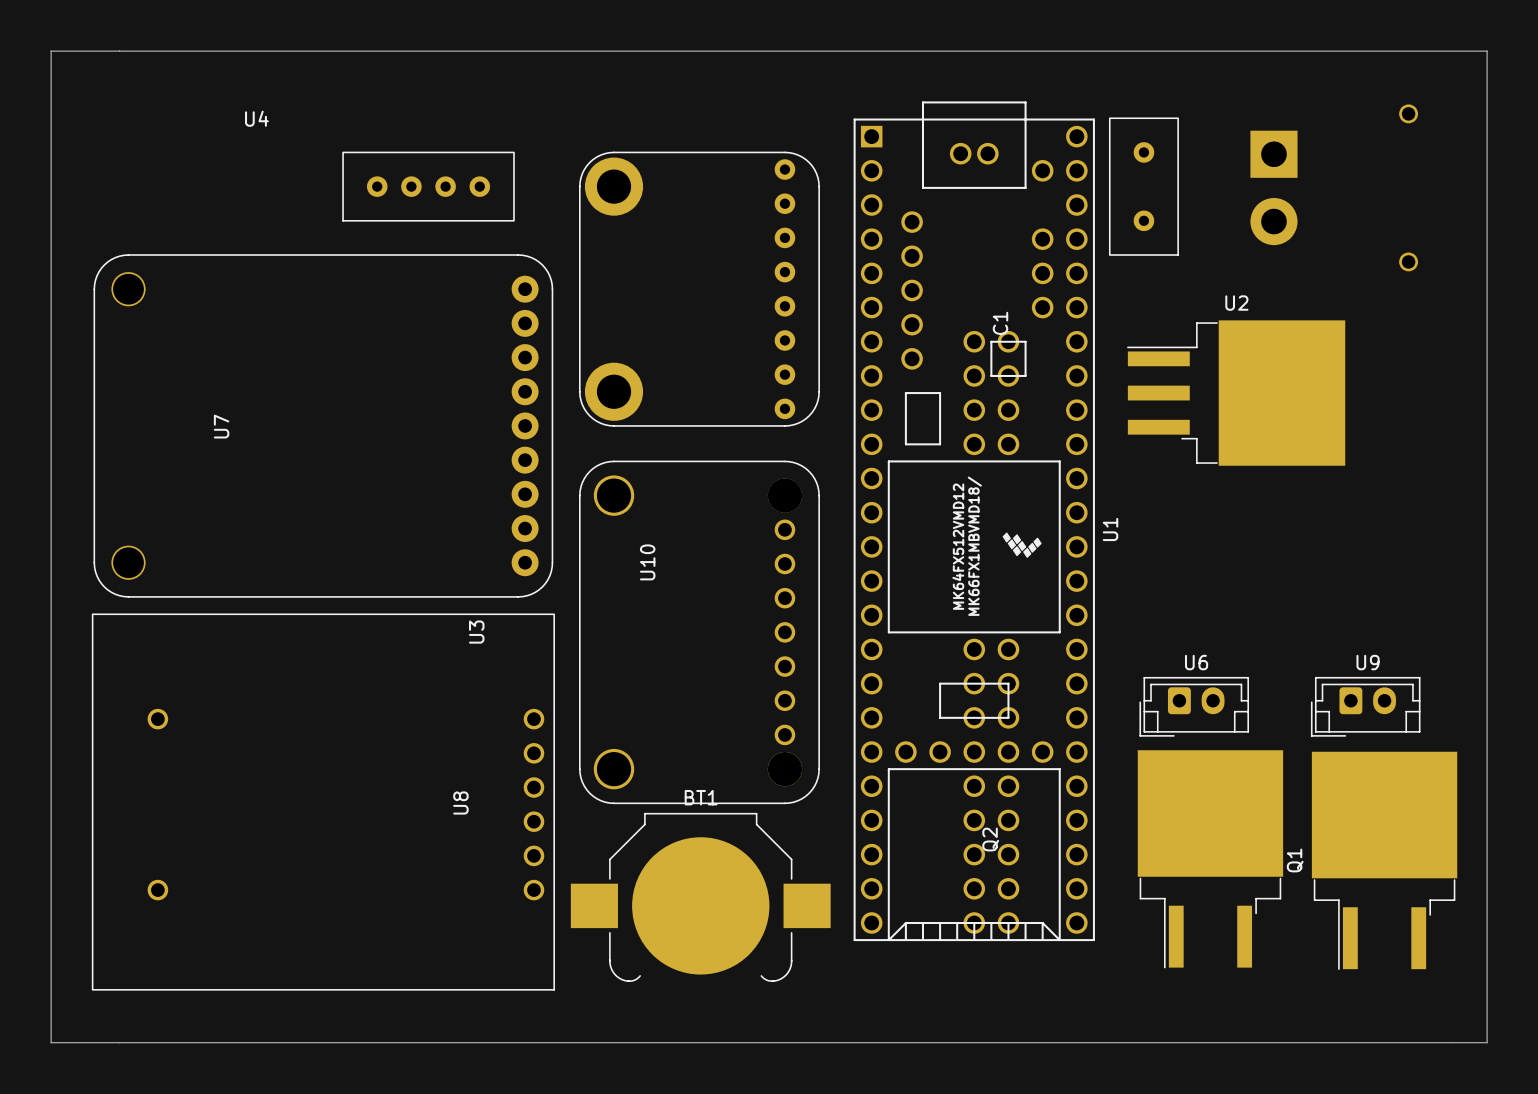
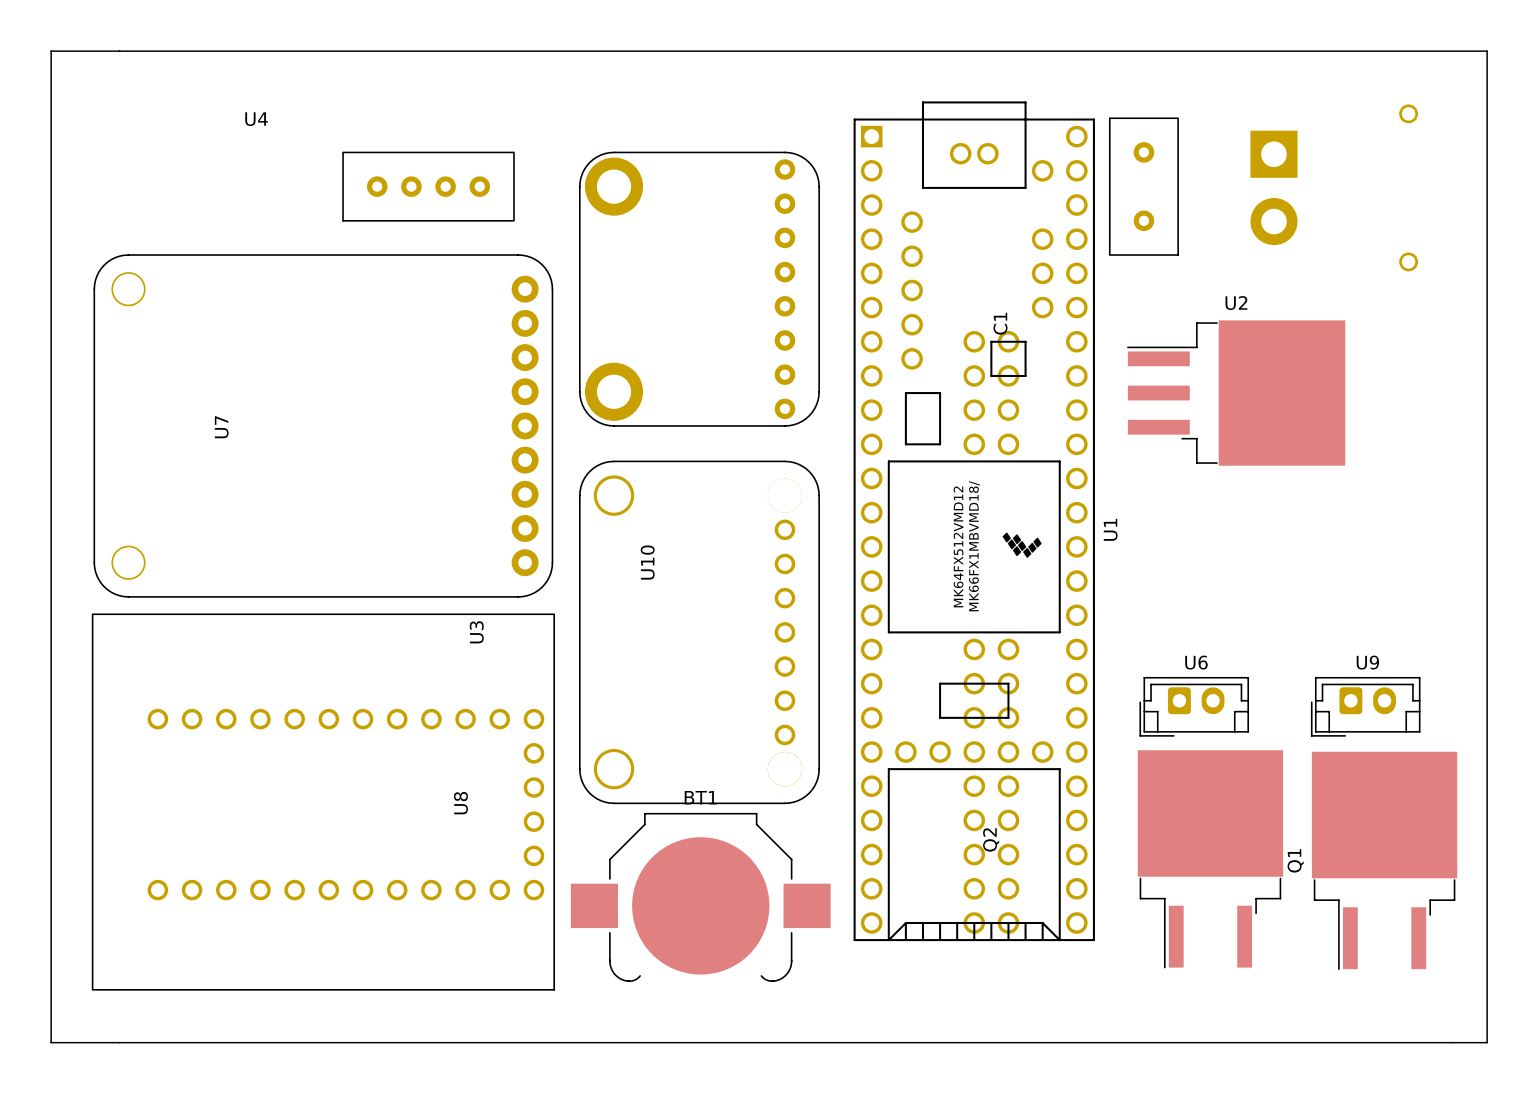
U8 footprint: [91, 613, 555, 991] -> [91, 613, 555, 991]

